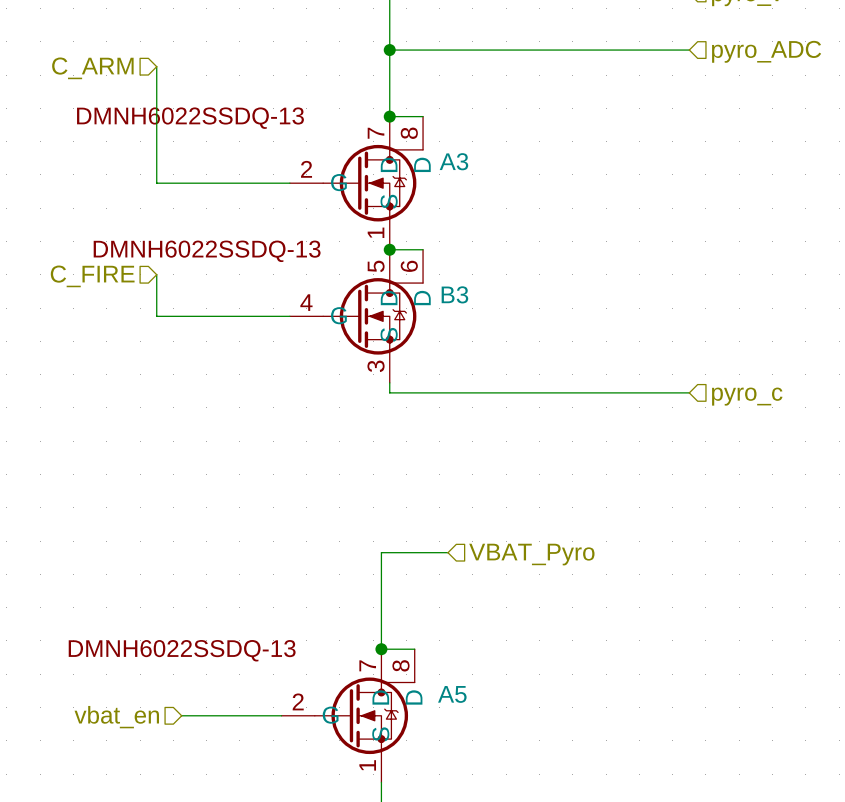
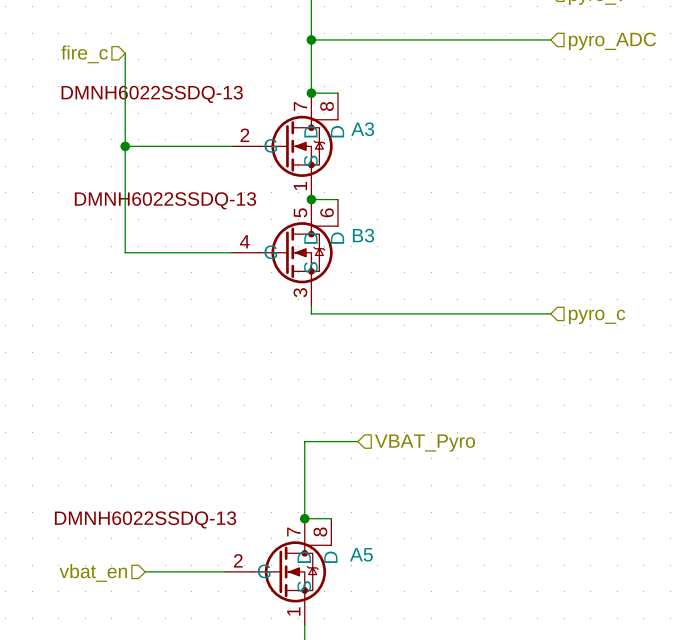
hierarchical label: C_ARM (92, 68) -> fire_c (84, 54)
wire: none -> (125, 146) (125, 219)
junction: none -> (125, 146)
hierarchical label: C_FIRE (92, 276) -> none

